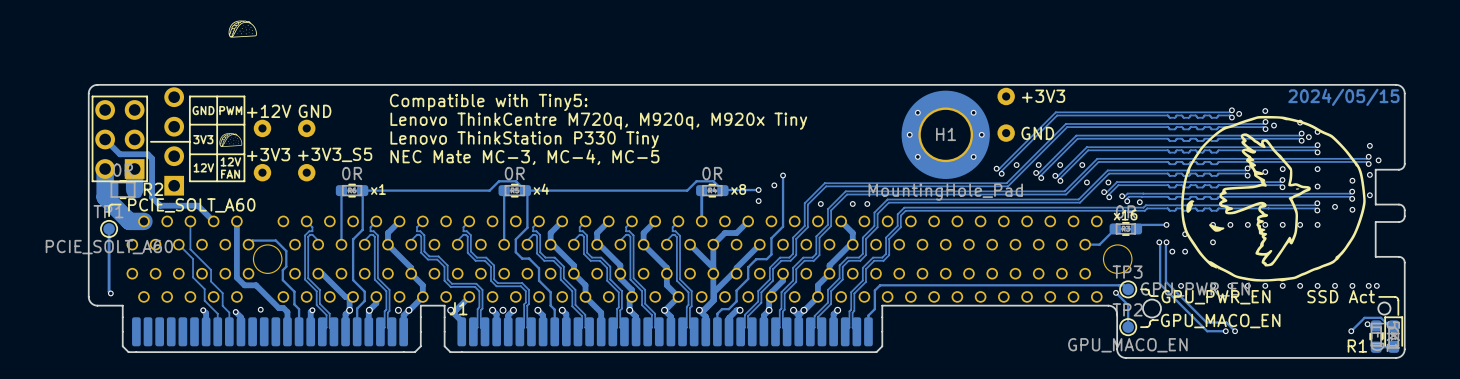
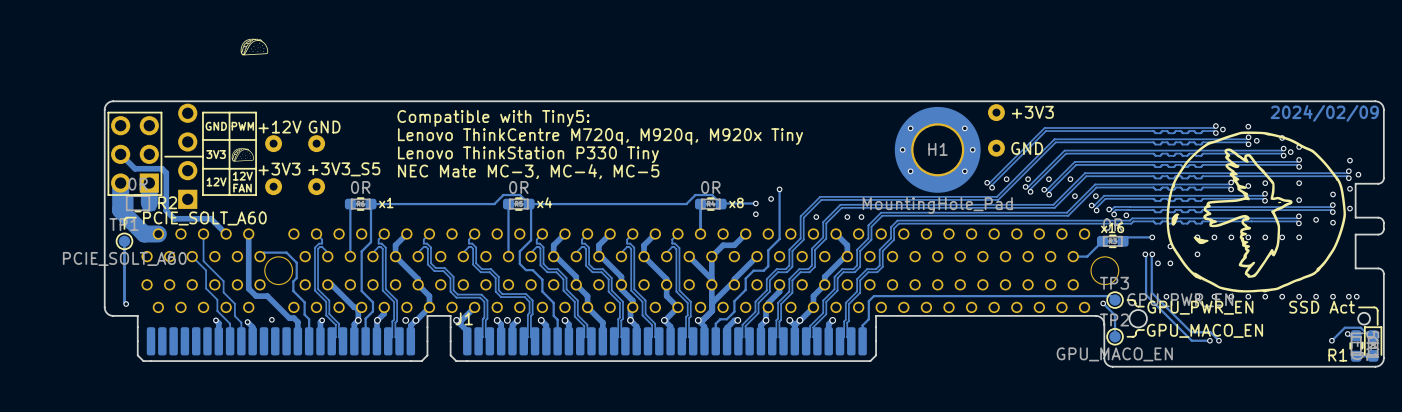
text: 2024/05/15 (1343, 97) -> 2024/02/09 (1324, 113)

